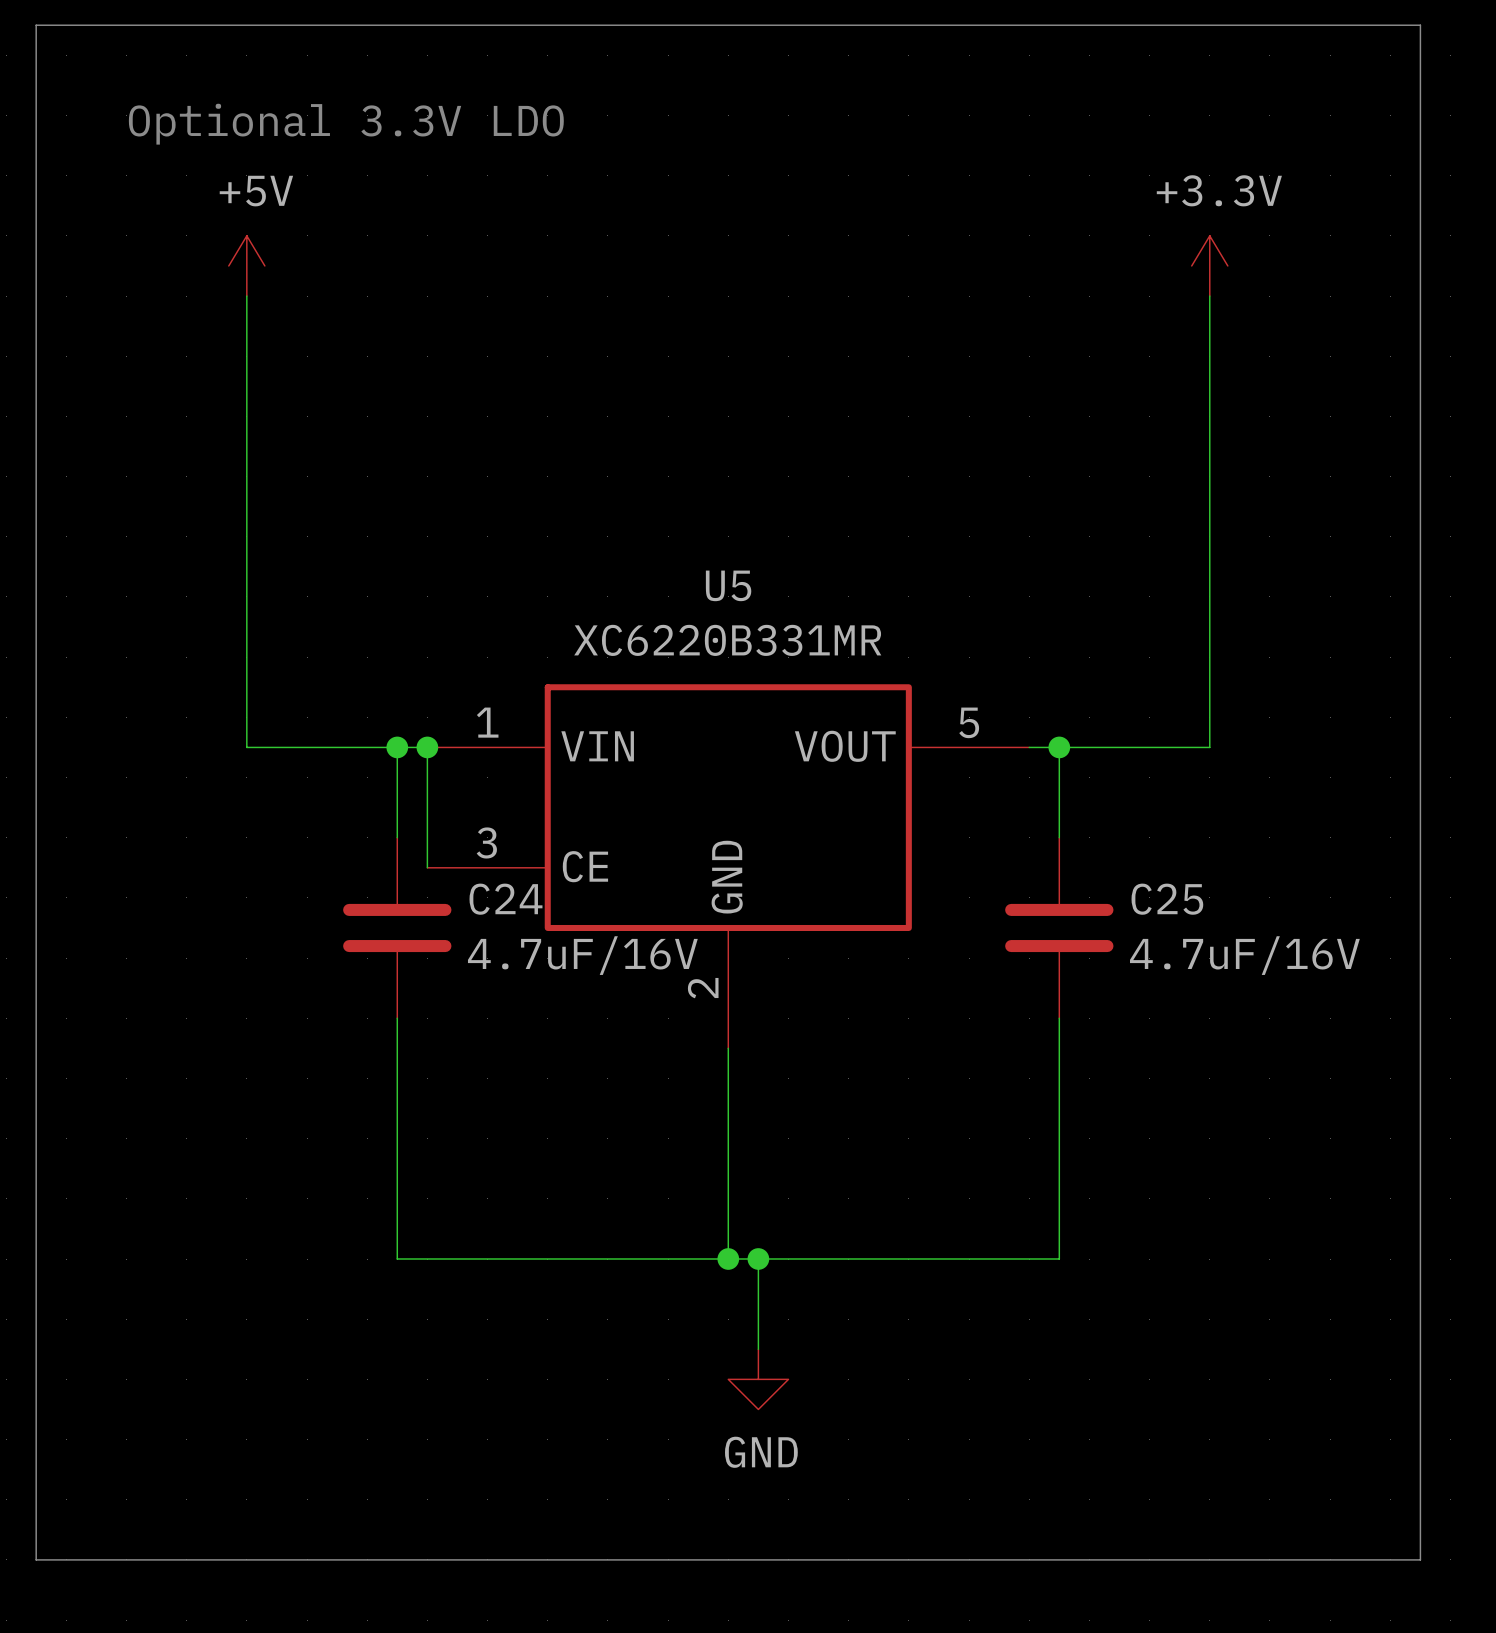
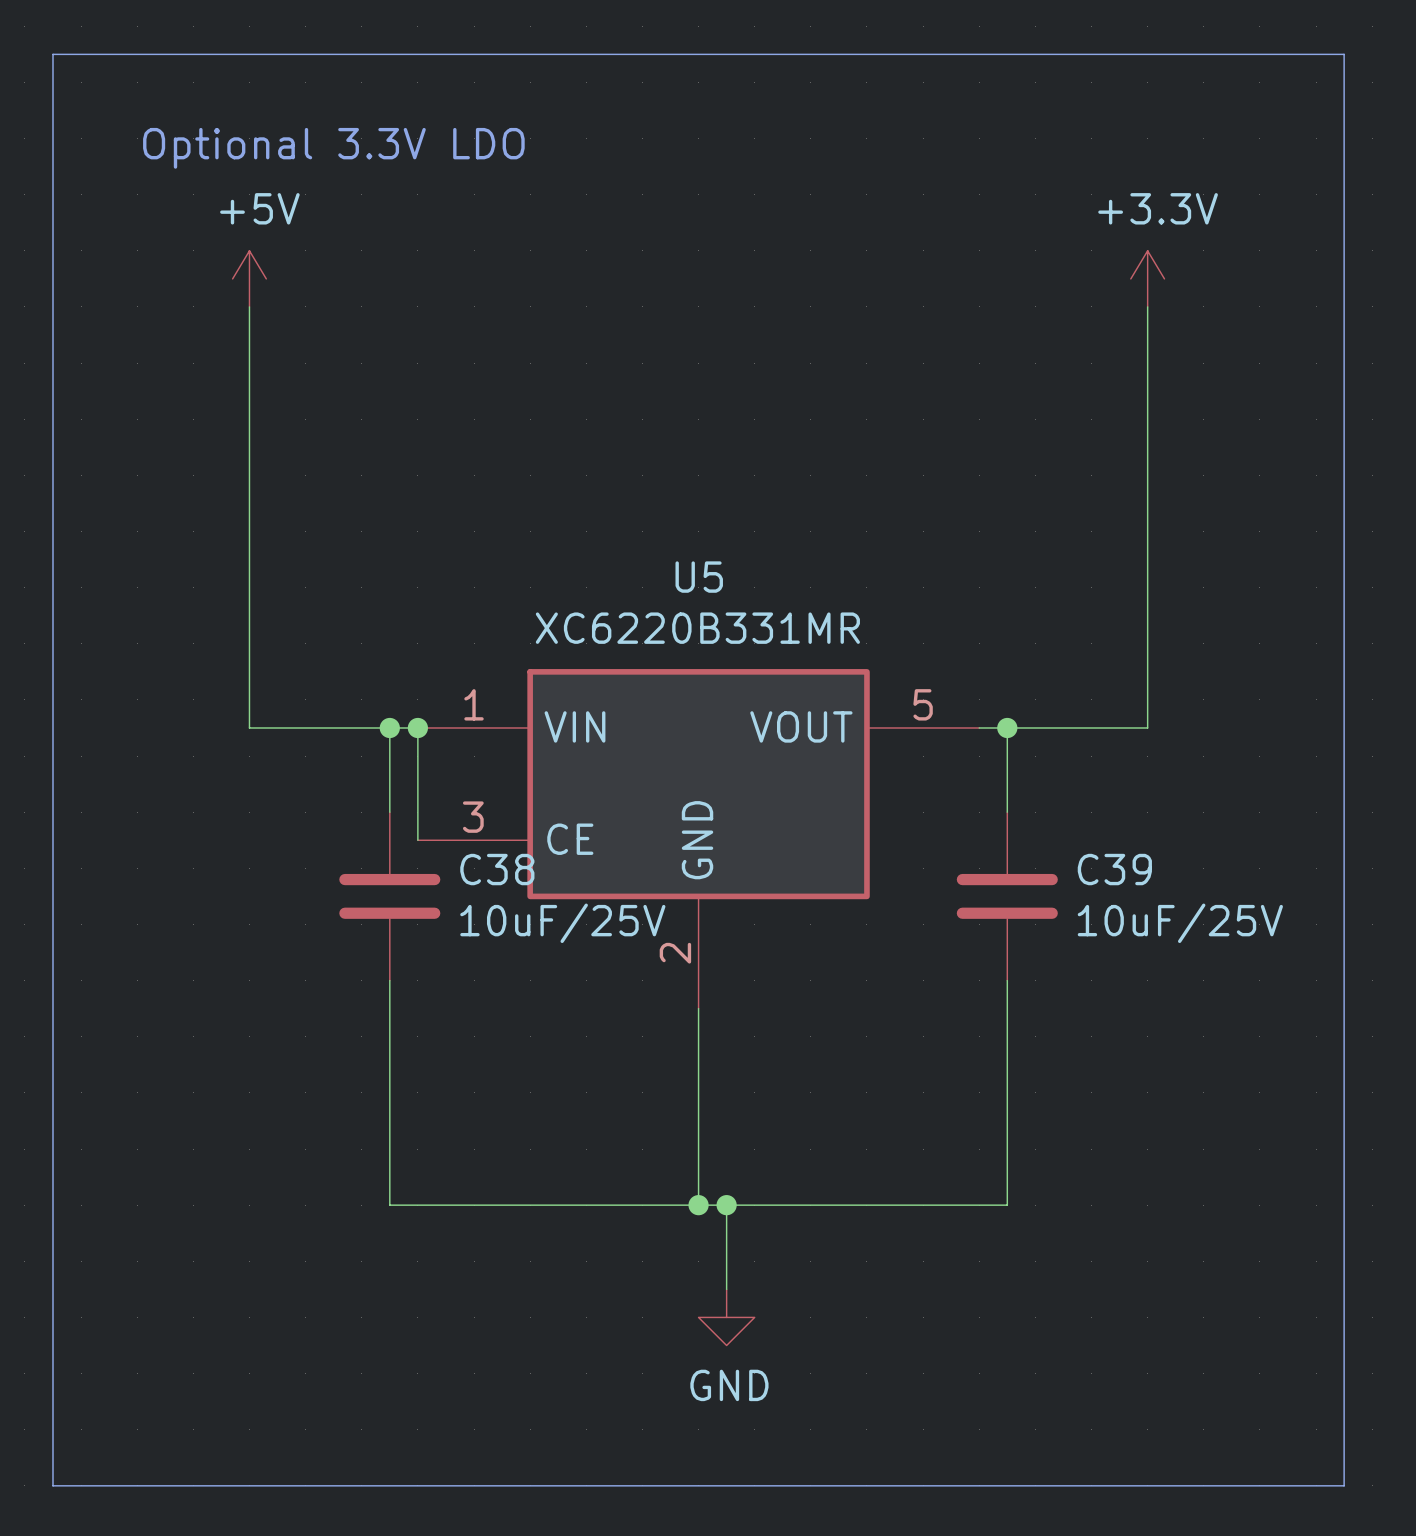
C24 name: C24 (505, 899) -> C38 (497, 869)
C25 name: C25 (1167, 899) -> C39 (1114, 869)
C24 value: 4.7uF/16V (582, 955) -> 10uF/25V (562, 923)
C25 value: 4.7uF/16V (1244, 955) -> 10uF/25V (1180, 923)

